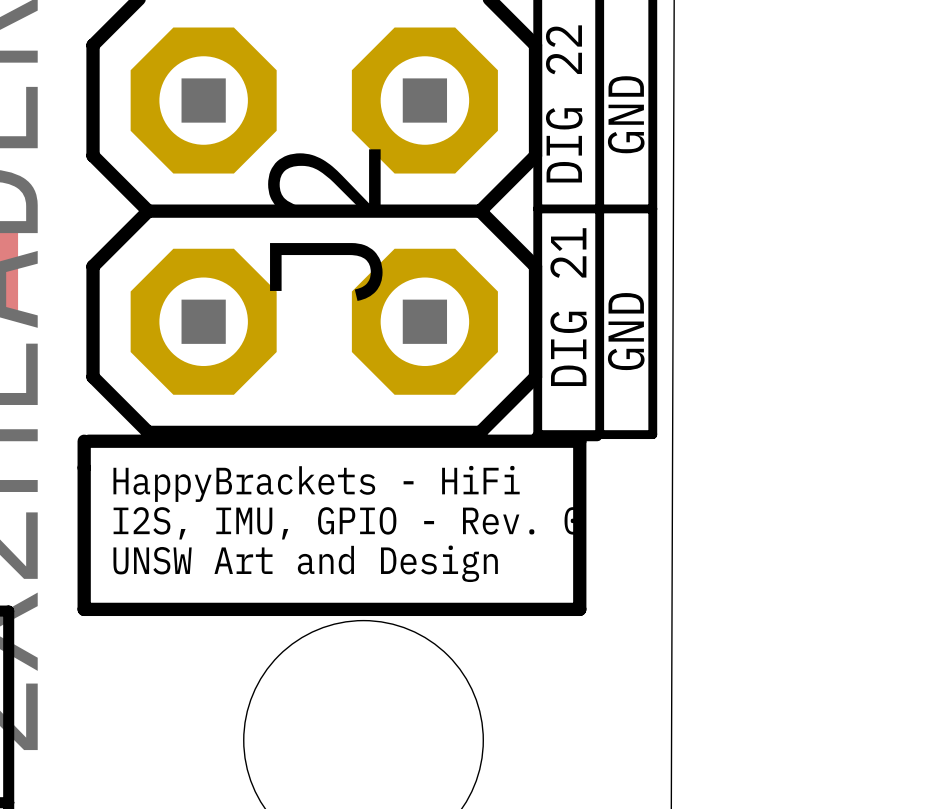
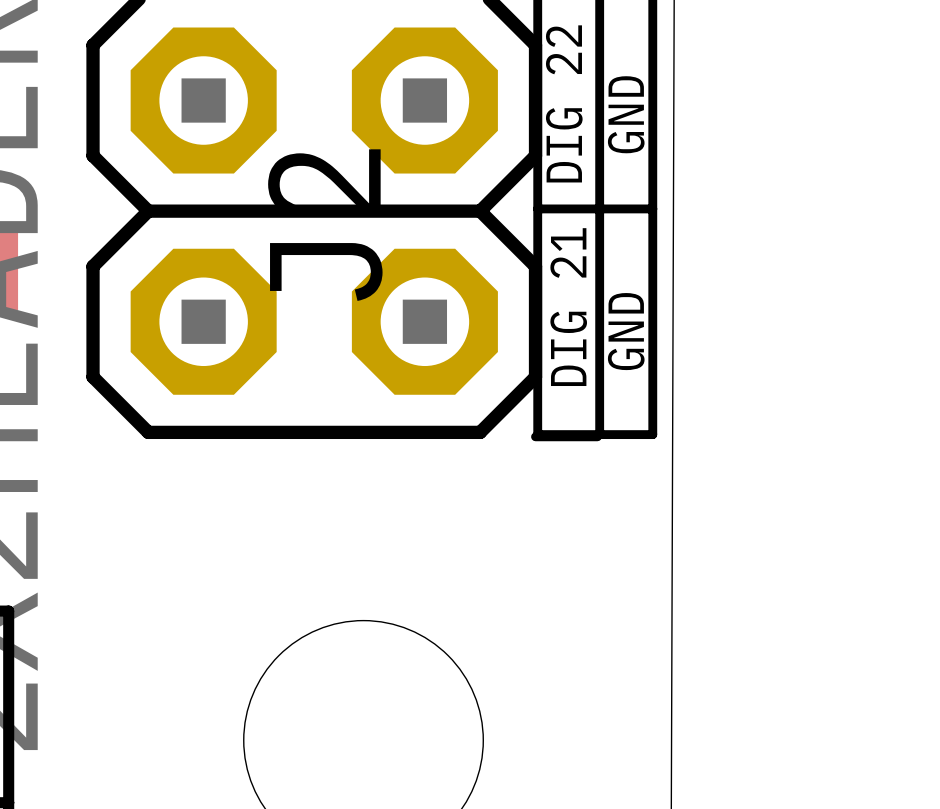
line: (84, 441) (84, 609) (579, 609) (579, 441) (88, 441) -> none
text: HappyBrackets - HiFi (316, 483) -> none
text: I2S, IMU, GPIO - Rev. 0 (347, 523) -> none
text: UNSW Art and Design (305, 563) -> none

